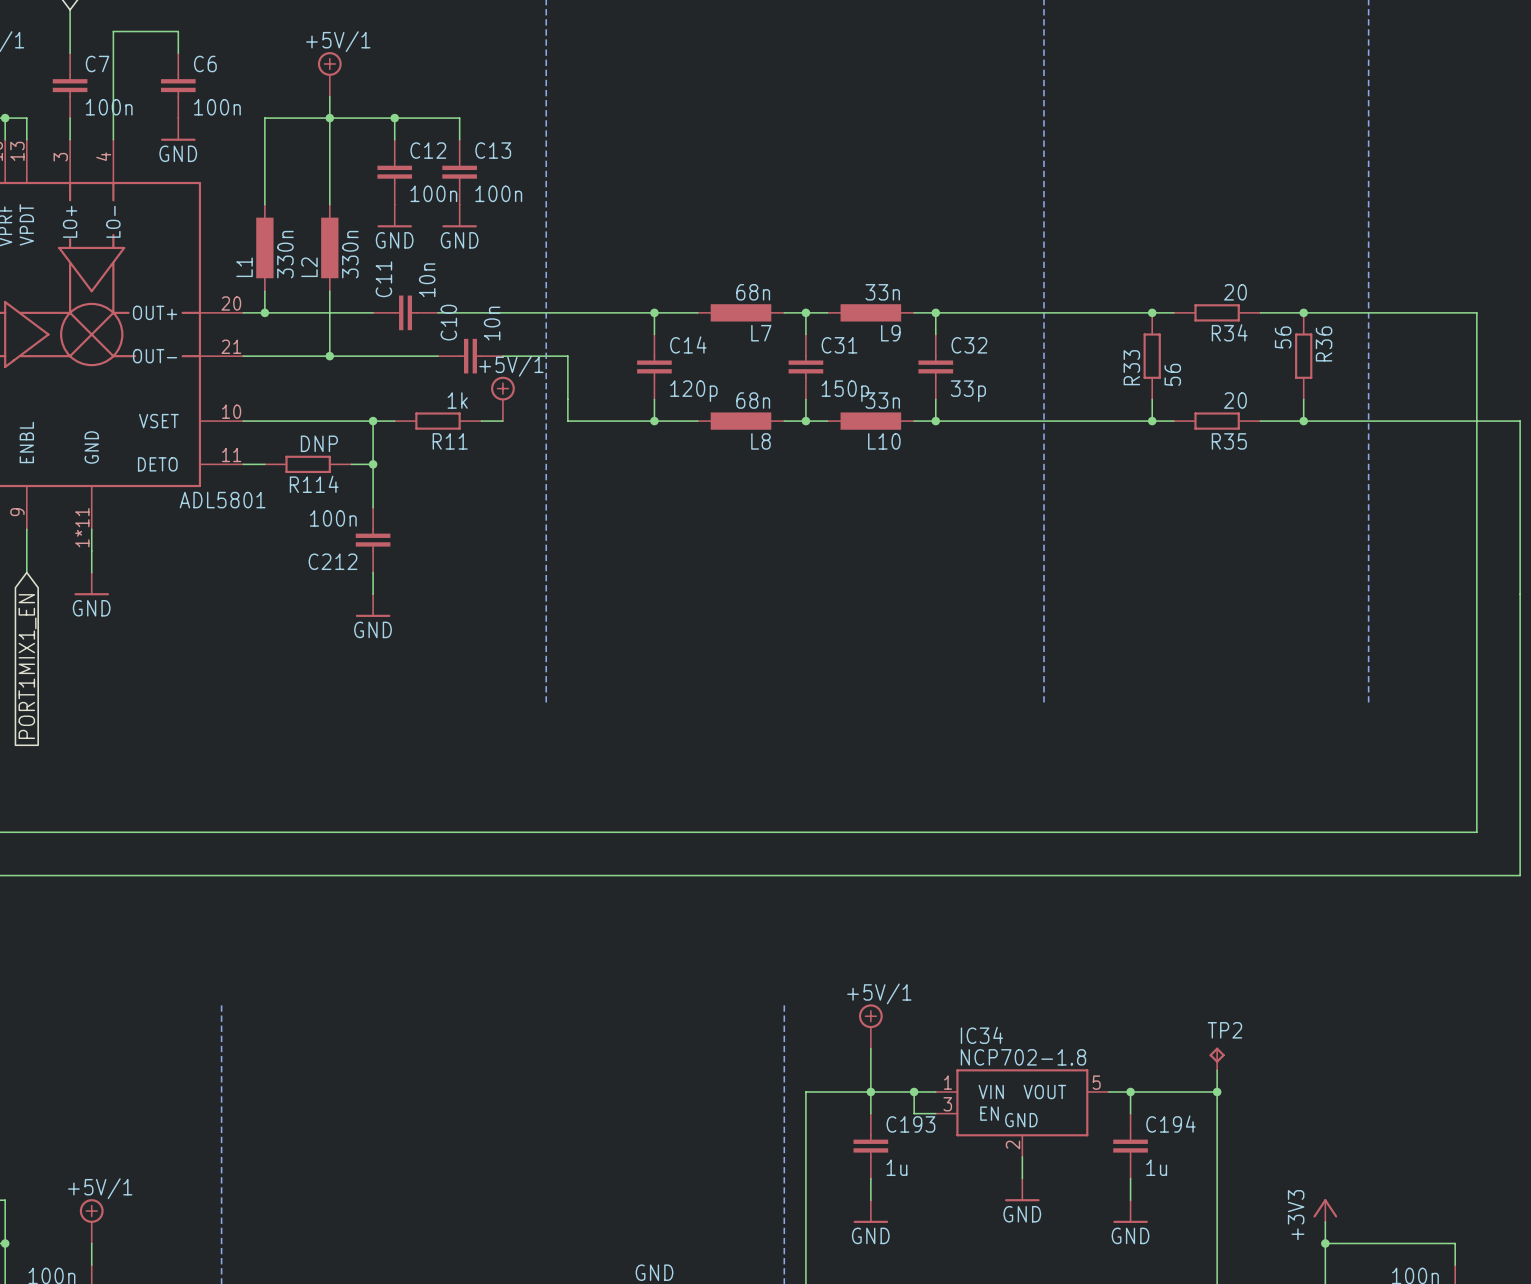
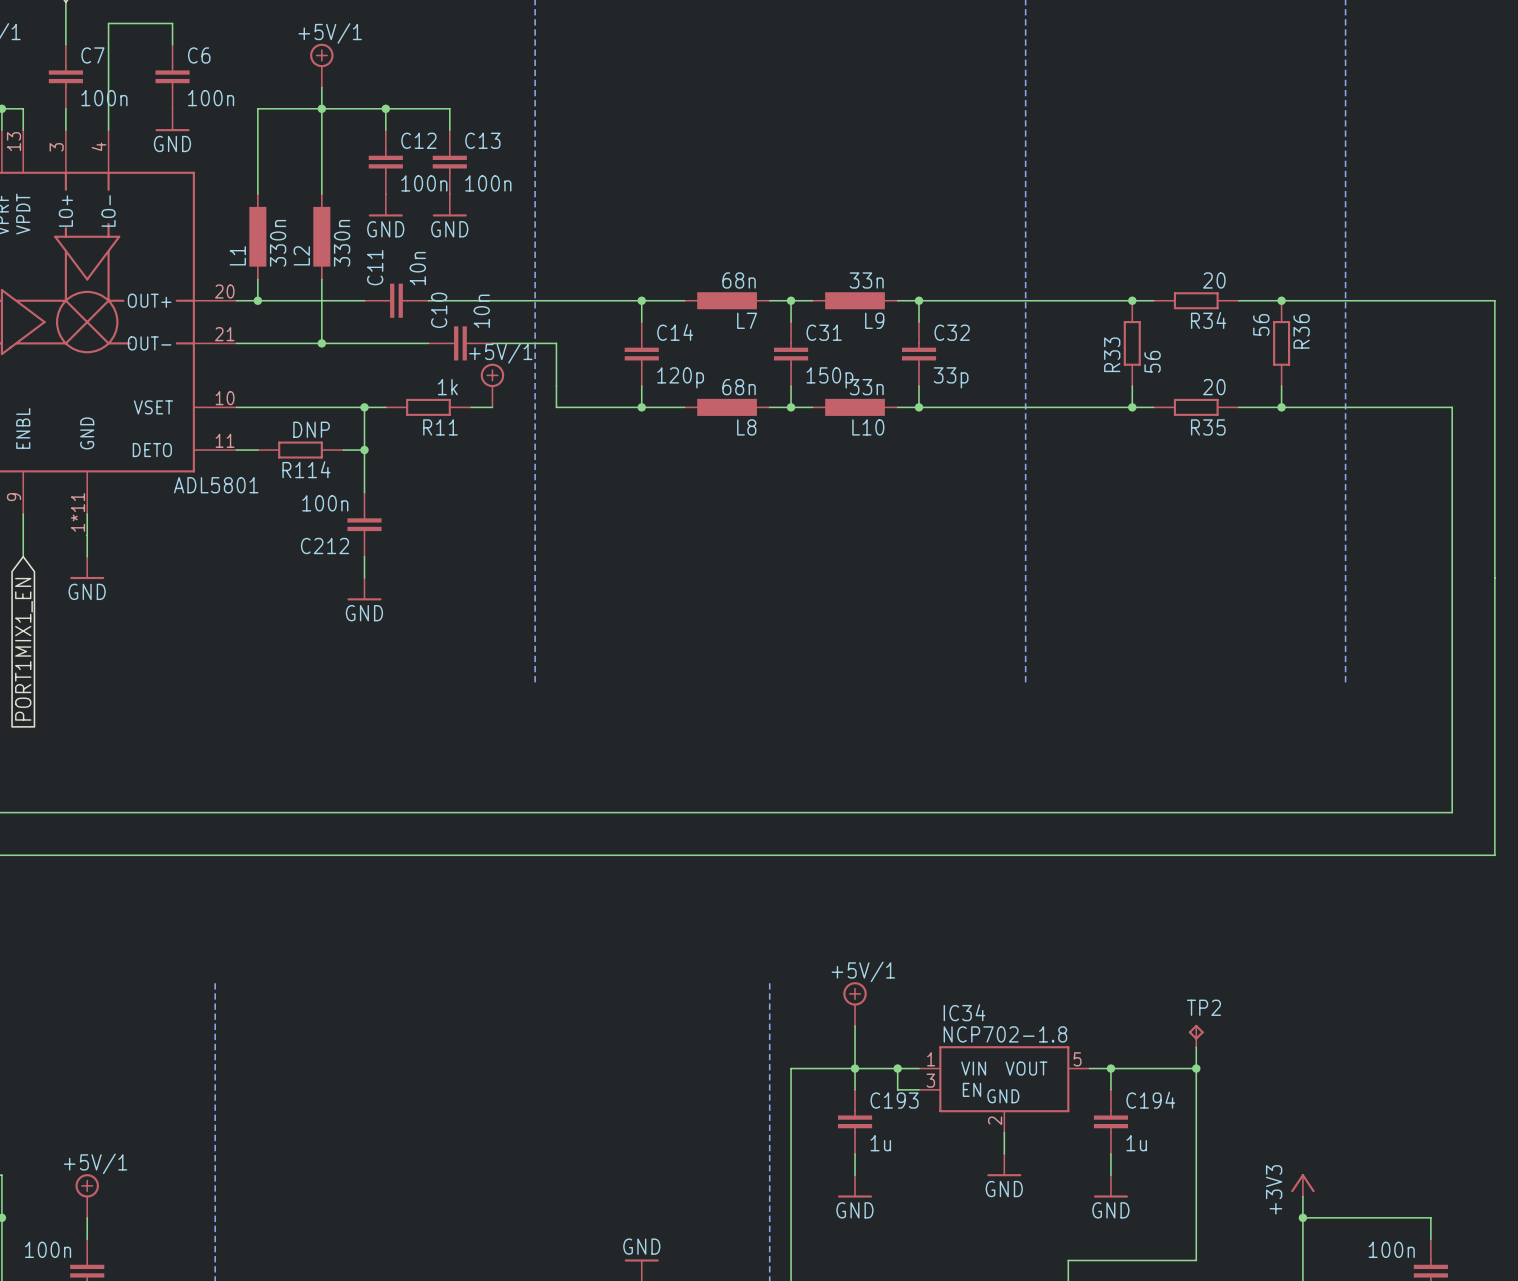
wire: (1476, 312) (1476, 421) (1520, 421) -> (1452, 300) (1494, 300) (1494, 407)

